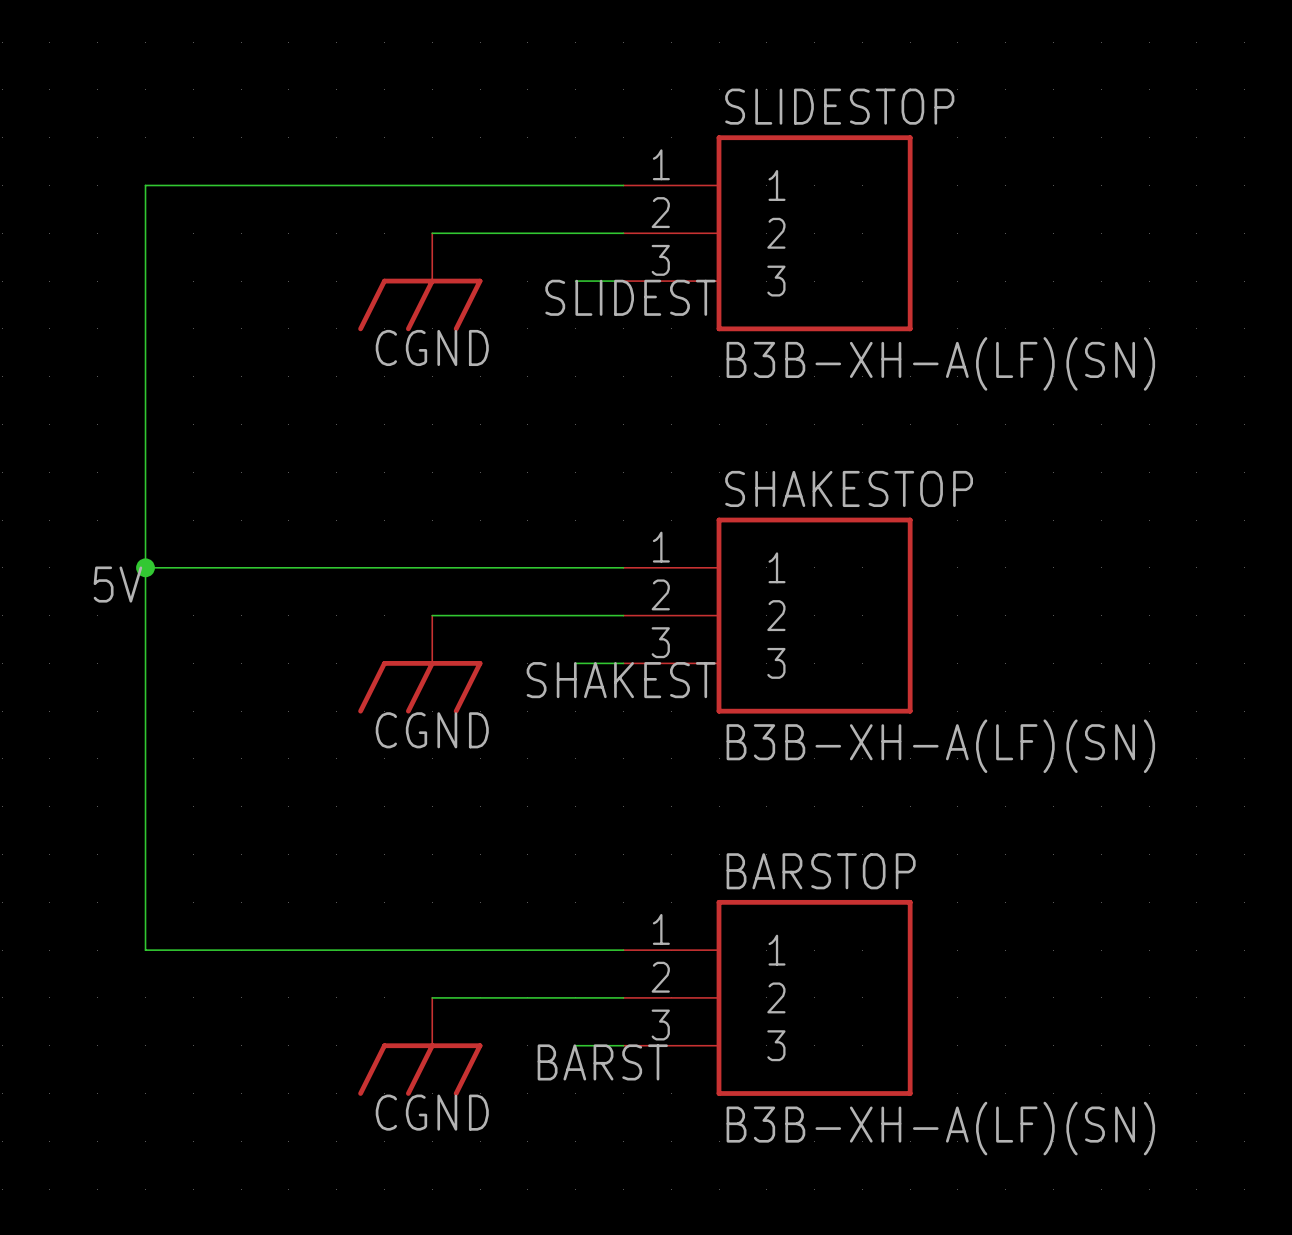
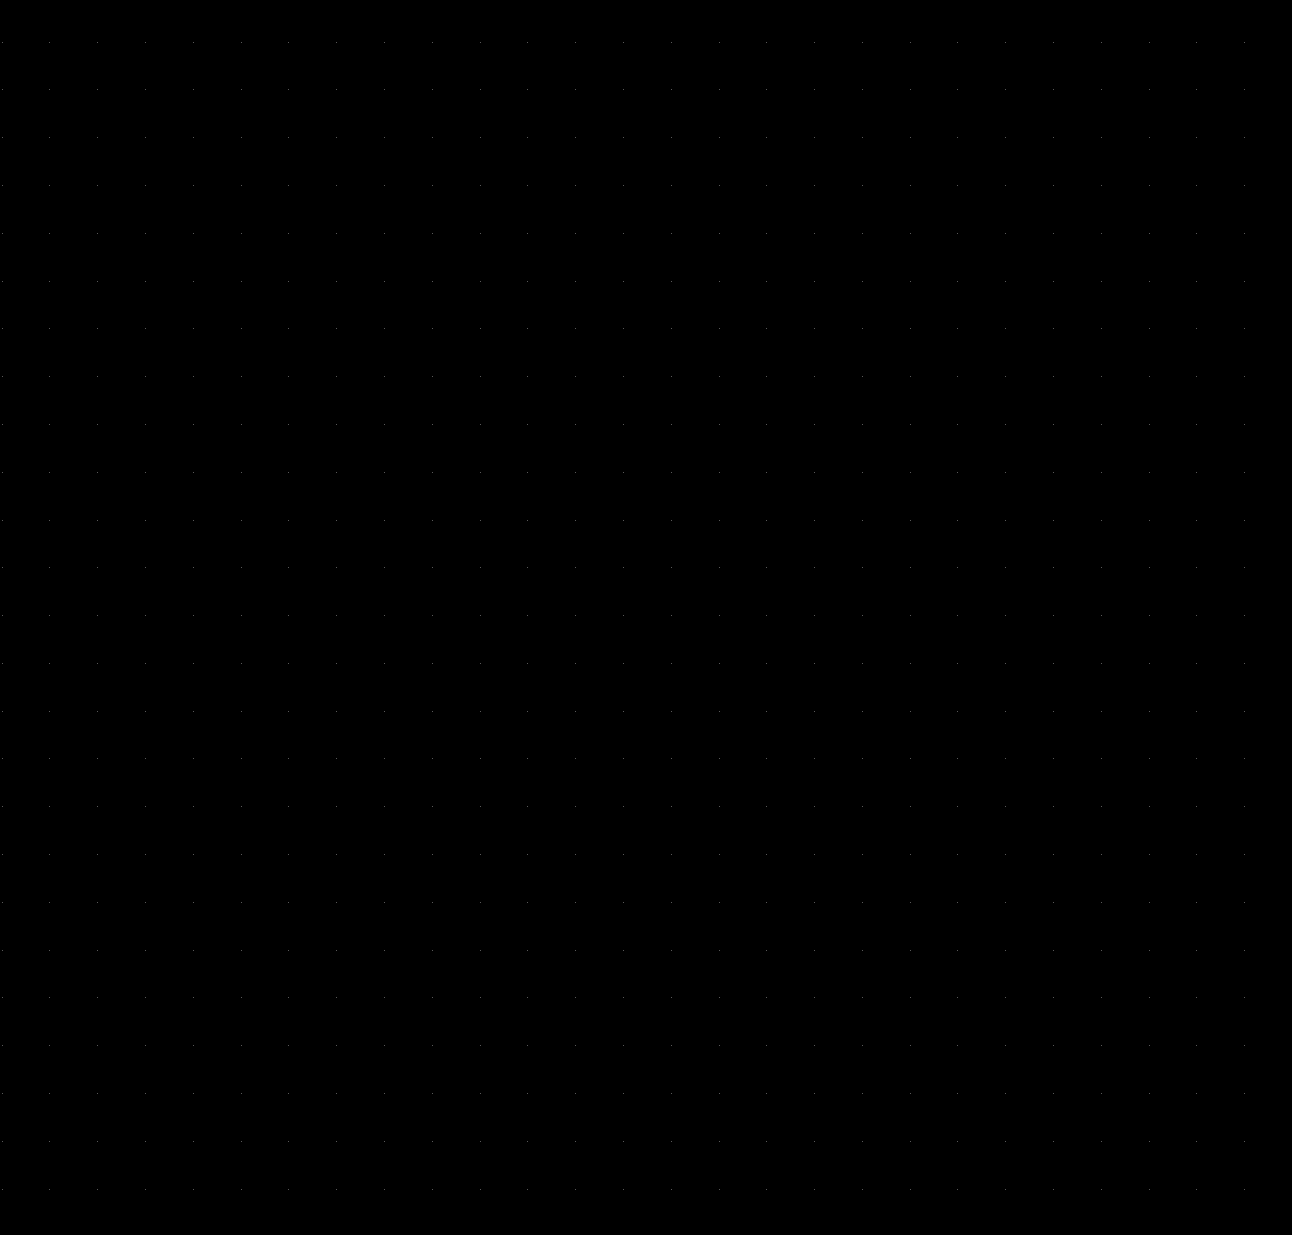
wire: (623, 185) (145, 185) (145, 950) (623, 950) -> none
wire: (432, 233) (623, 233) -> none
SLIDESTOP: B3B-XH-A(LF)(SN) (767, 233) -> none
wire: (575, 281) (623, 281) -> none
power symbol: CGND (420, 282) -> none
label: SLIDEST (630, 297) -> none
wire: (145, 567) (623, 567) -> none
junction: (145, 567) -> none
label: 5V (117, 584) -> none
wire: (432, 615) (623, 615) -> none
SHAKESTOP: B3B-XH-A(LF)(SN) (767, 615) -> none
wire: (575, 663) (623, 663) -> none
power symbol: CGND (420, 664) -> none
label: SHAKEST (621, 680) -> none
wire: (432, 997) (623, 997) -> none
BARSTOP: B3B-XH-A(LF)(SN) (767, 997) -> none
wire: (575, 1045) (623, 1045) -> none
power symbol: CGND (420, 1046) -> none
label: BARST (602, 1062) -> none

